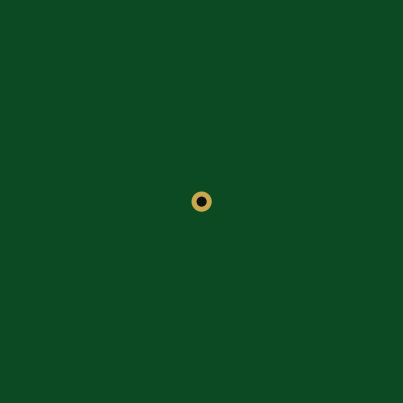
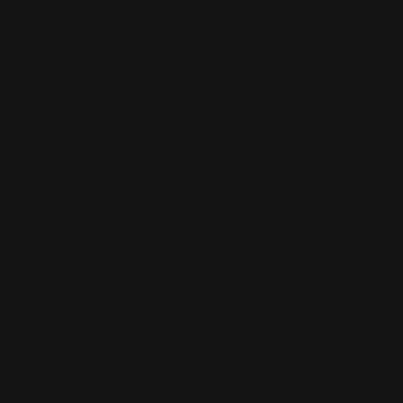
via: (201, 201) -> none

